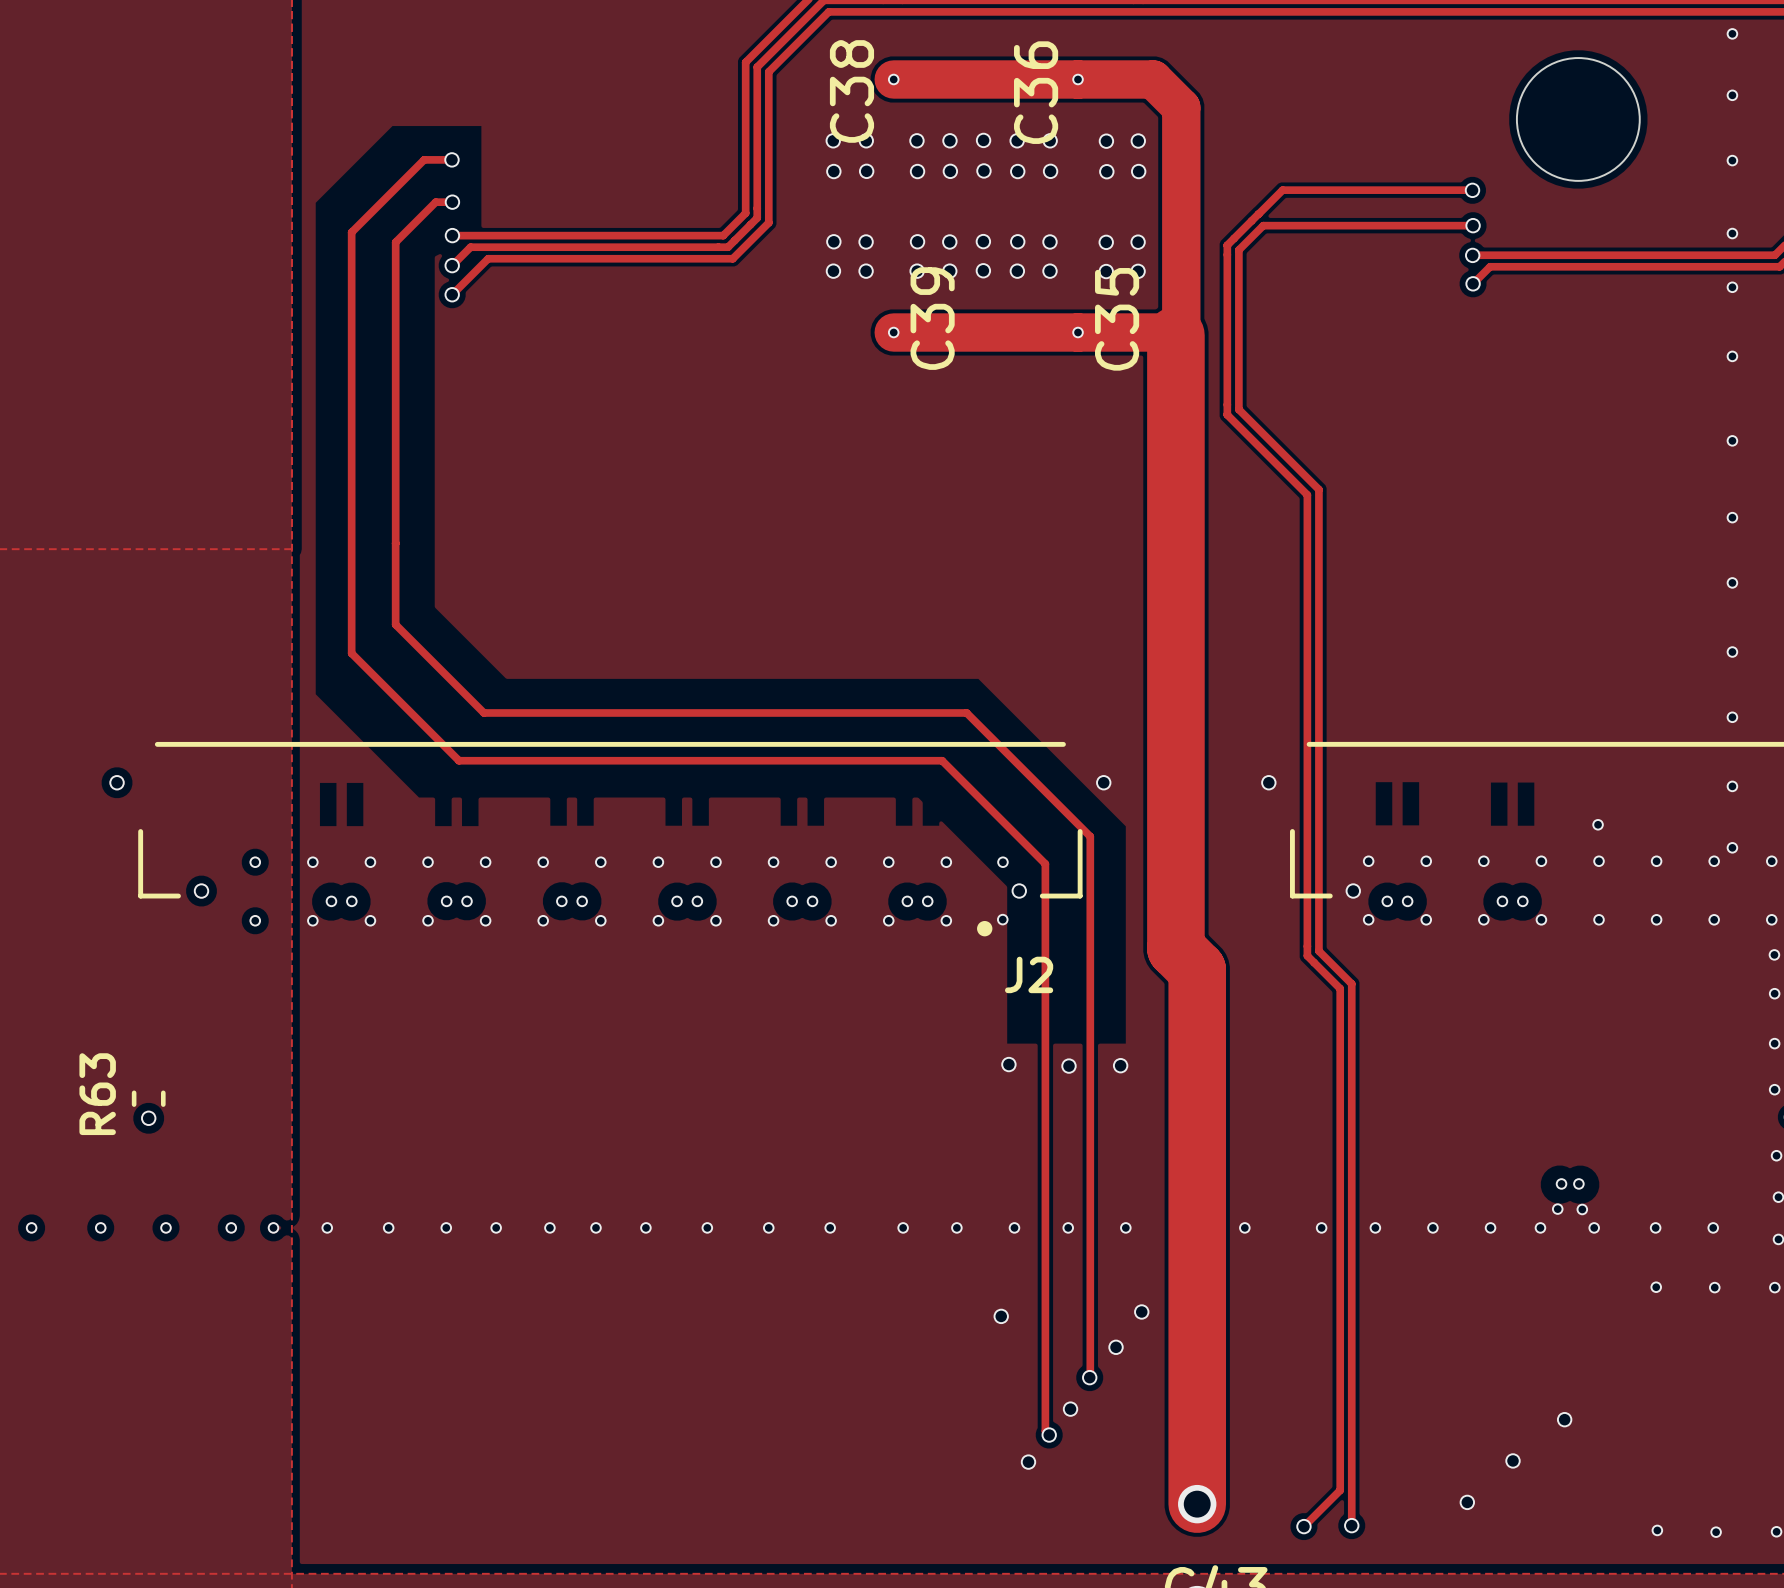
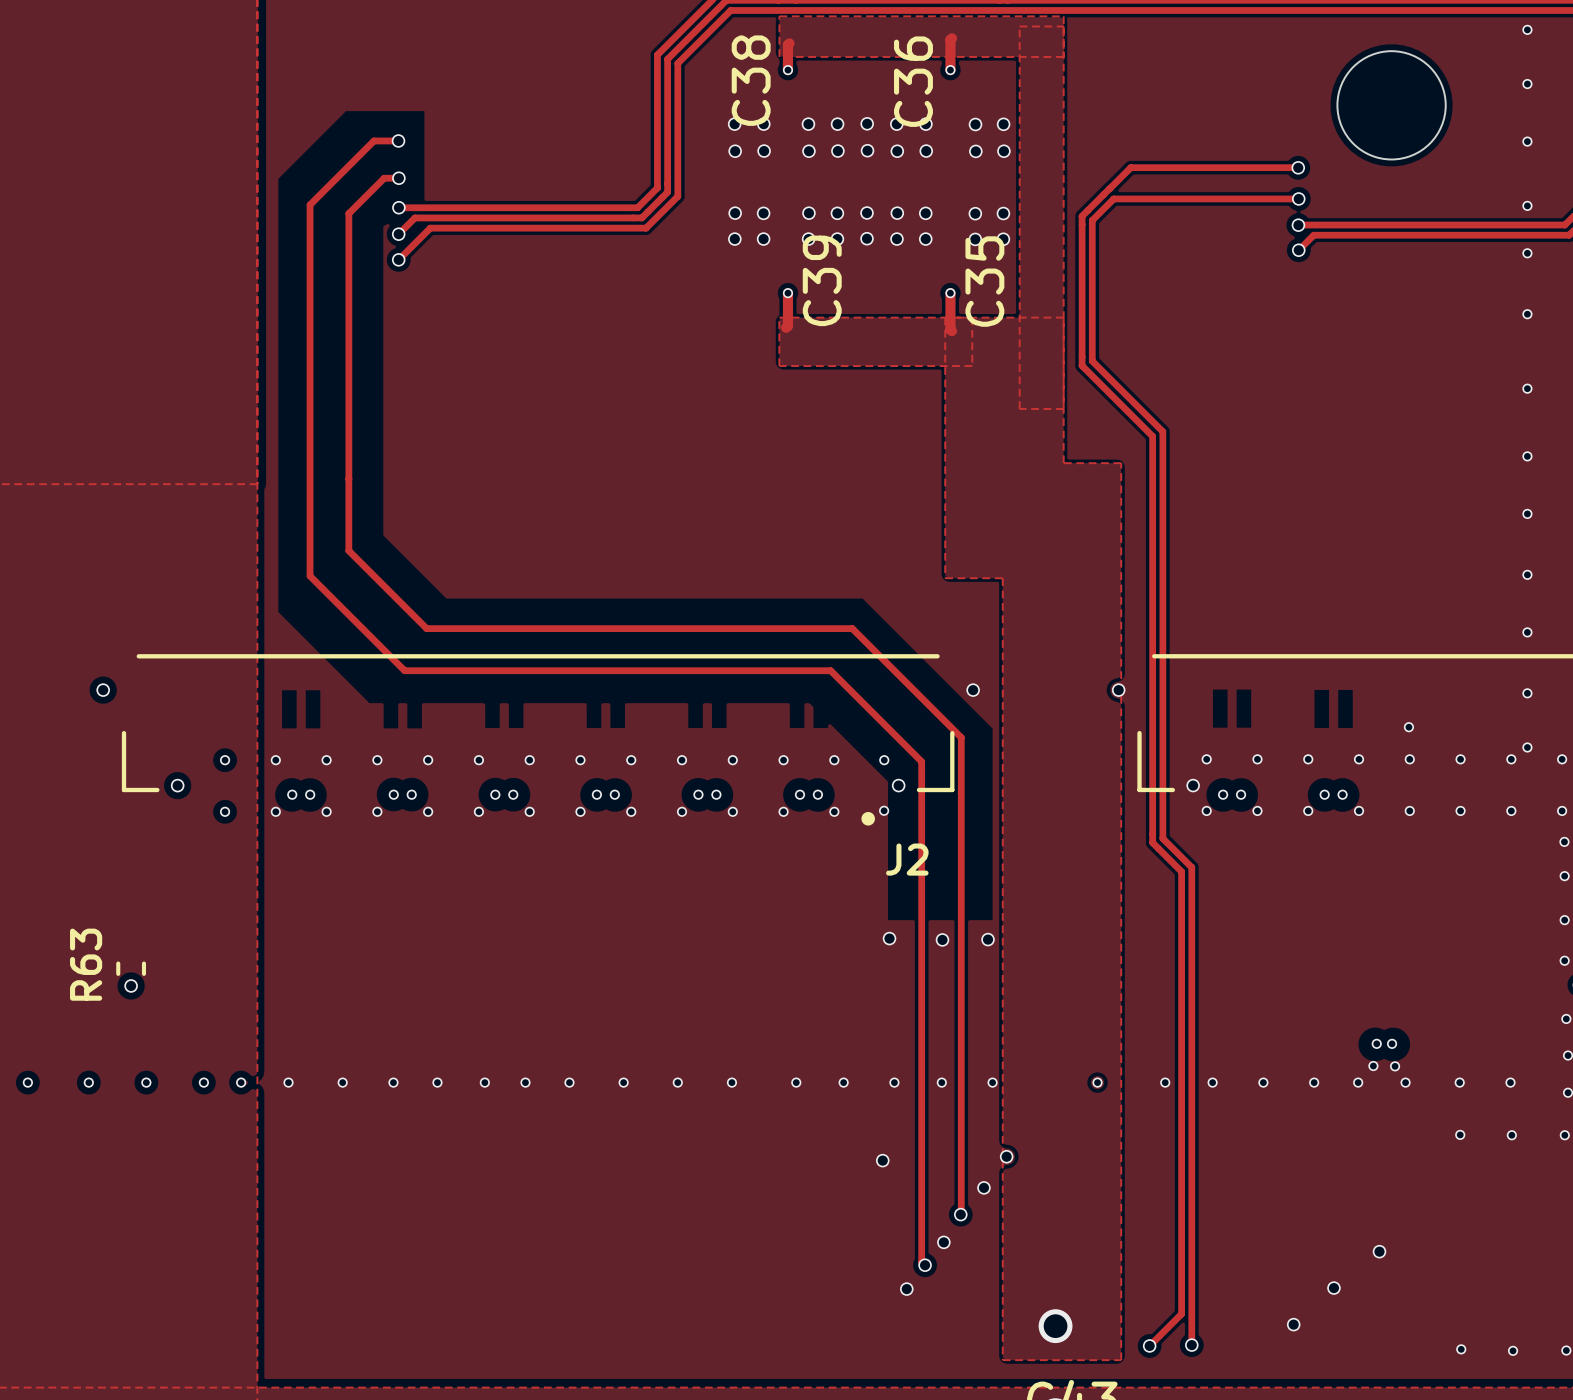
zone outline: none -> (1063, 26) (1019, 26) (1019, 408) (1063, 408)
track: none -> (951, 38) (950, 70)
zone outline: none -> (1063, 56) (779, 56) (779, 16) (1063, 16) (1063, 463) (1121, 463) (1121, 1360) (1002, 1360) (1002, 578) (945, 578) (945, 317)
track: (893, 79) (1153, 79) (1181, 107) (1181, 329) (1175, 335) -> (787, 70) (789, 43)
track: (893, 332) (1173, 332) (1175, 335) -> (787, 293) (787, 325) (786, 327)
track: none -> (950, 293) (951, 331)
track: (1175, 335) (1175, 948) (1197, 969) -> none
zone outline: none -> (972, 317) (972, 366) (779, 366) (779, 317) (1063, 317)
track: (1197, 969) (1197, 1504) -> none

